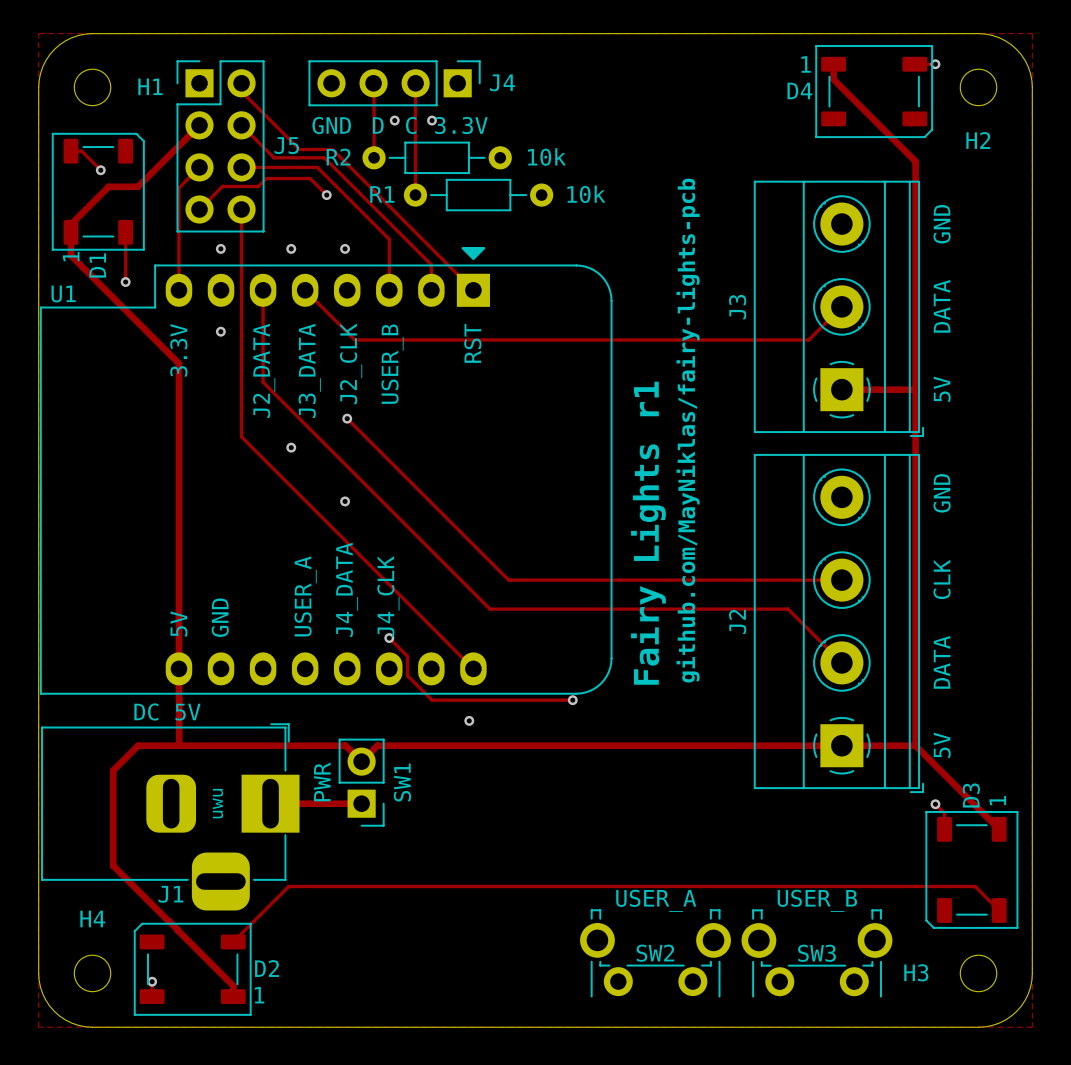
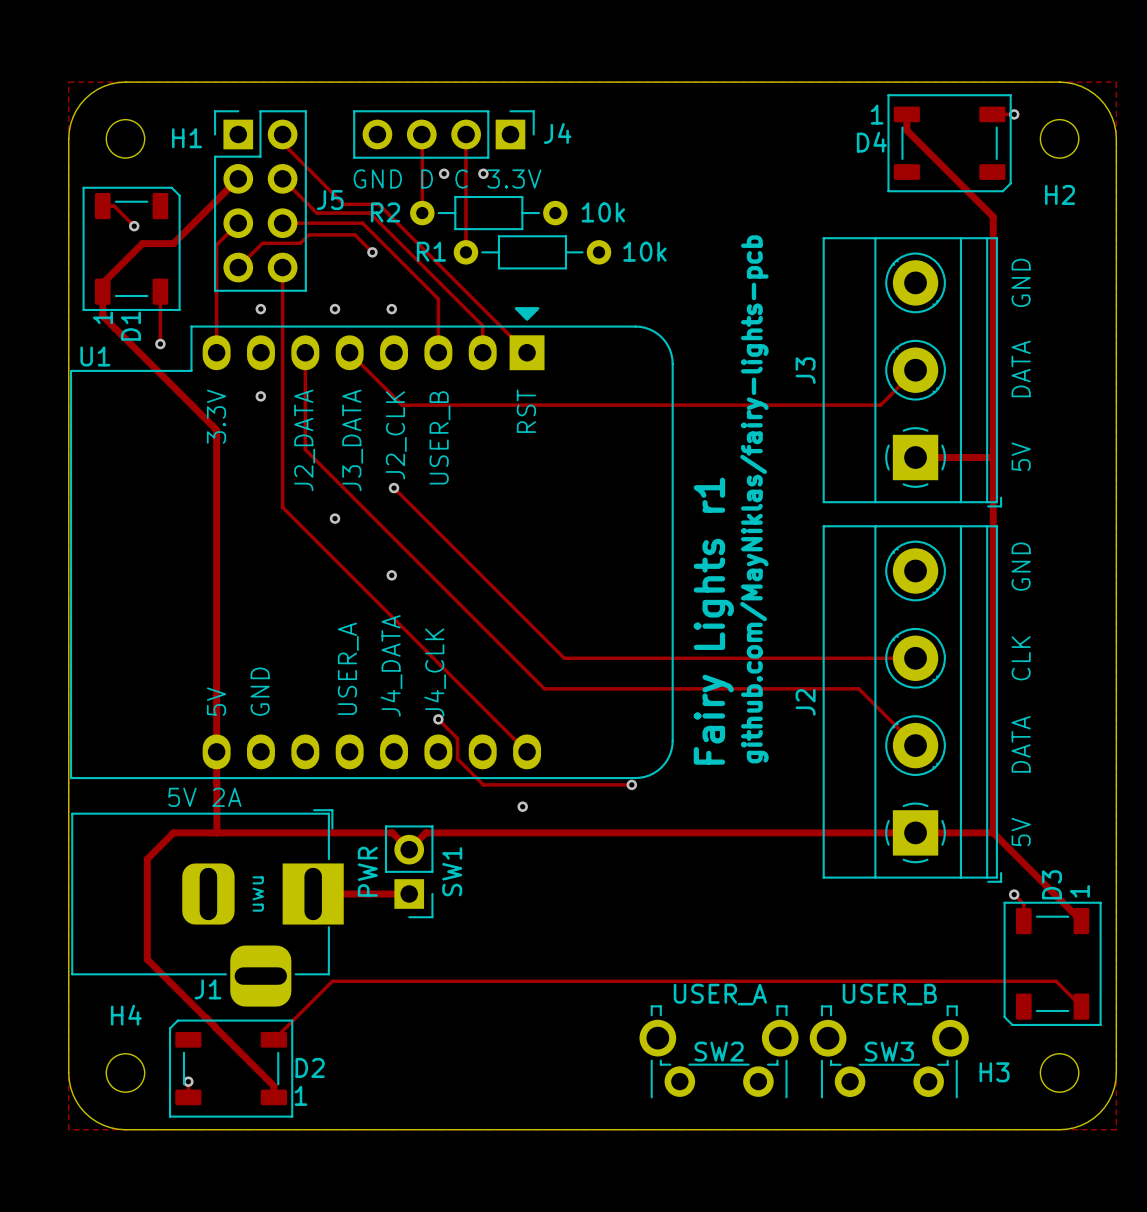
text: DC 5V (167, 712) -> 5V 2A (204, 797)

